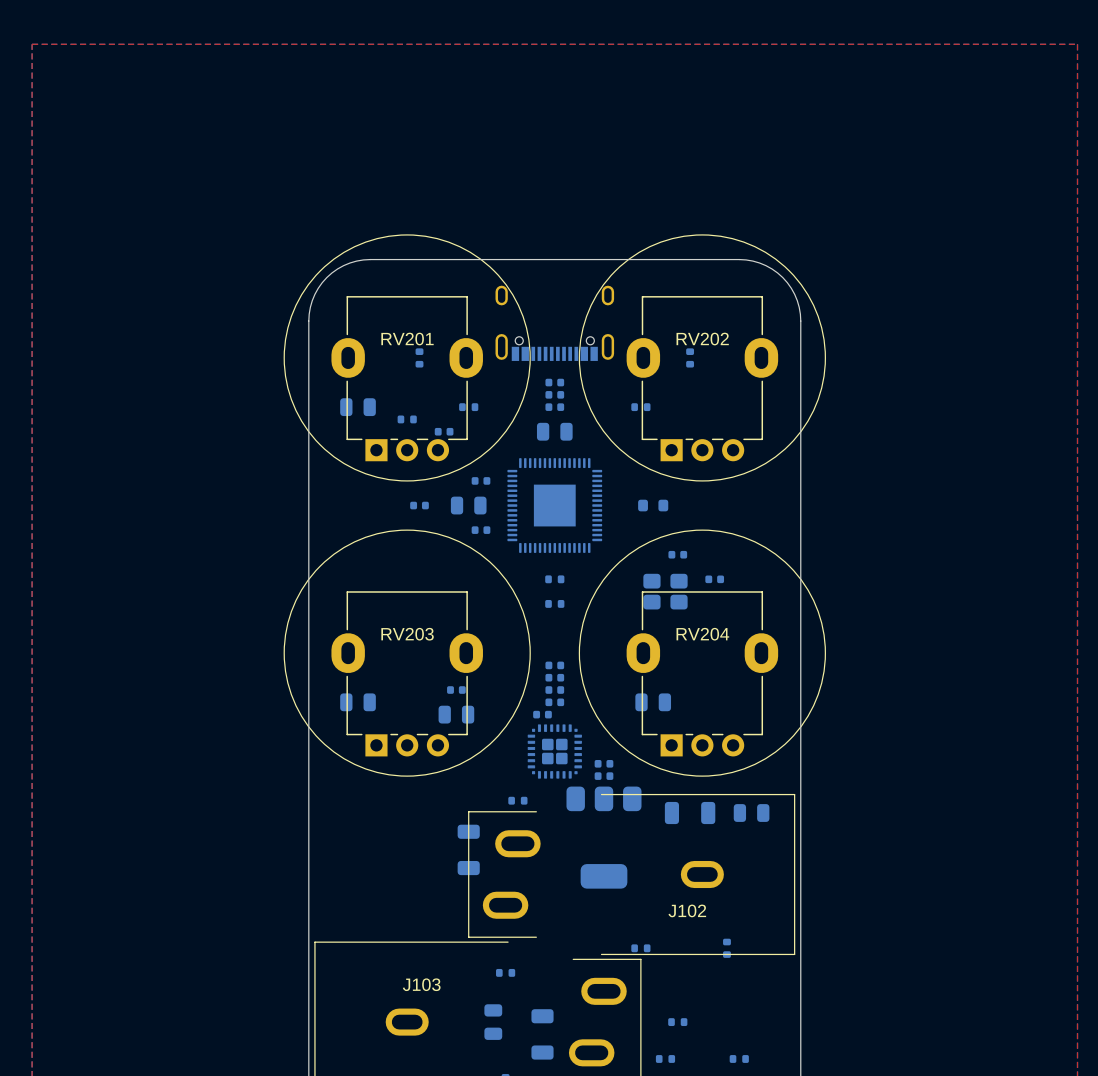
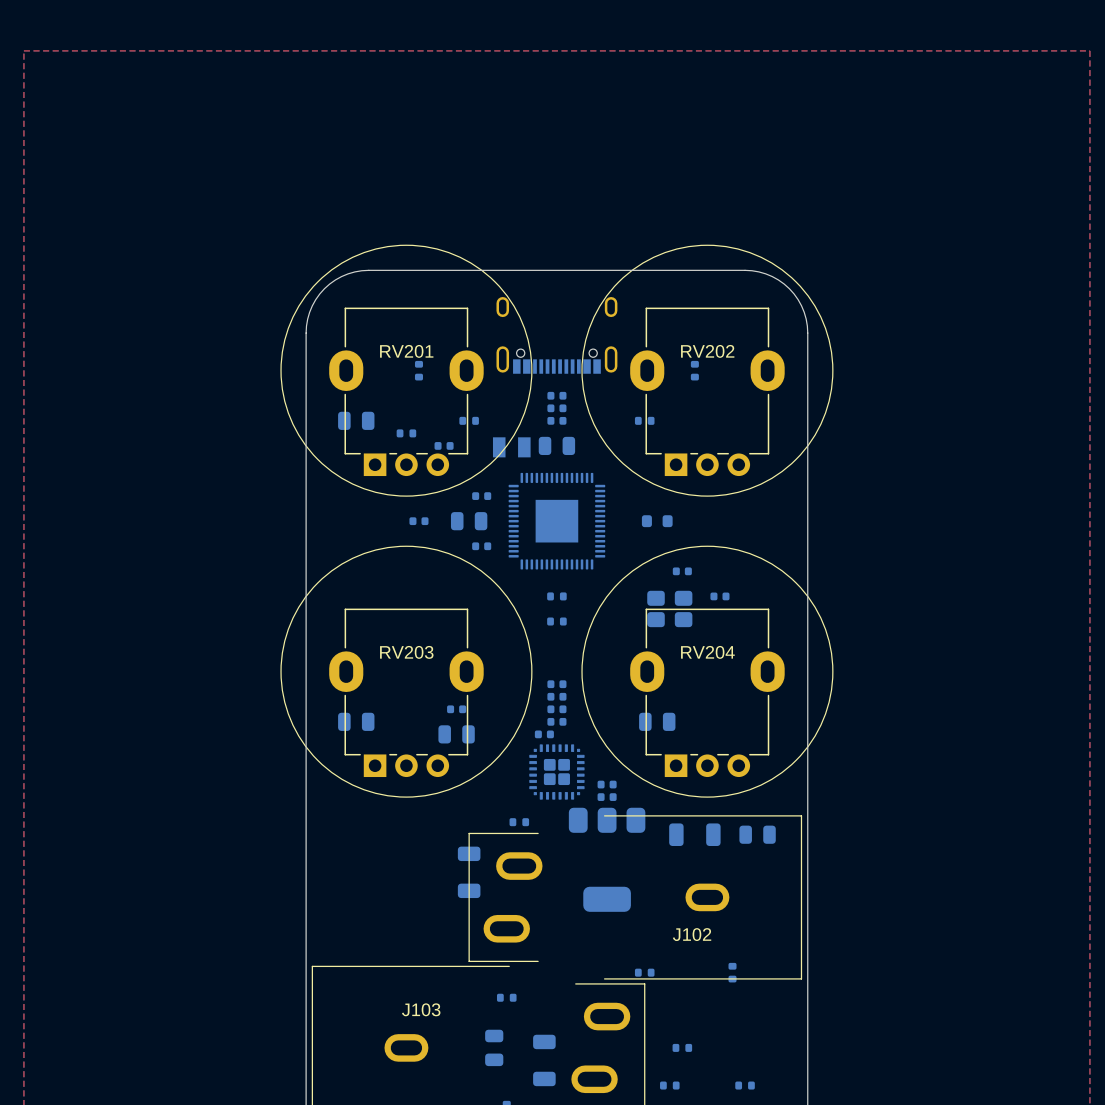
part: none -> (511, 447)

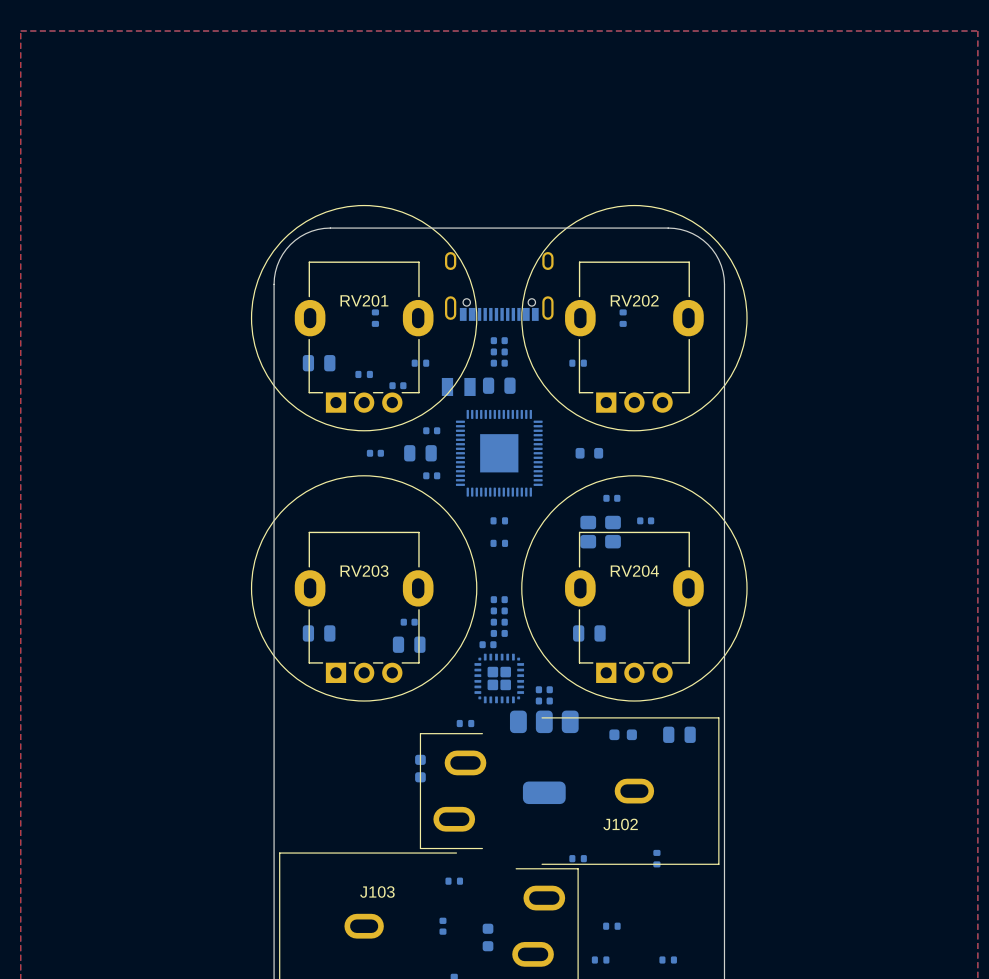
part footprint: [669, 823, 721, 847] -> [609, 729, 637, 741]
part footprint: [457, 846, 481, 899] -> [415, 754, 426, 783]
part footprint: [485, 1029, 504, 1067] -> [439, 917, 447, 935]
part footprint: [533, 1034, 556, 1087] -> [482, 923, 494, 952]

